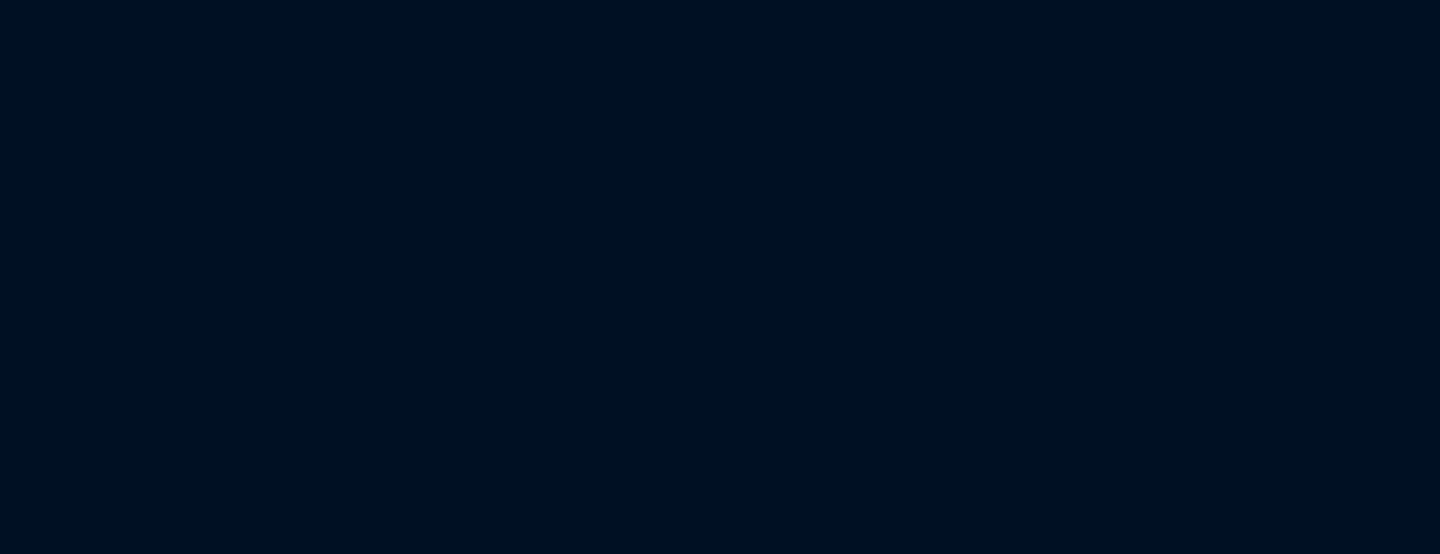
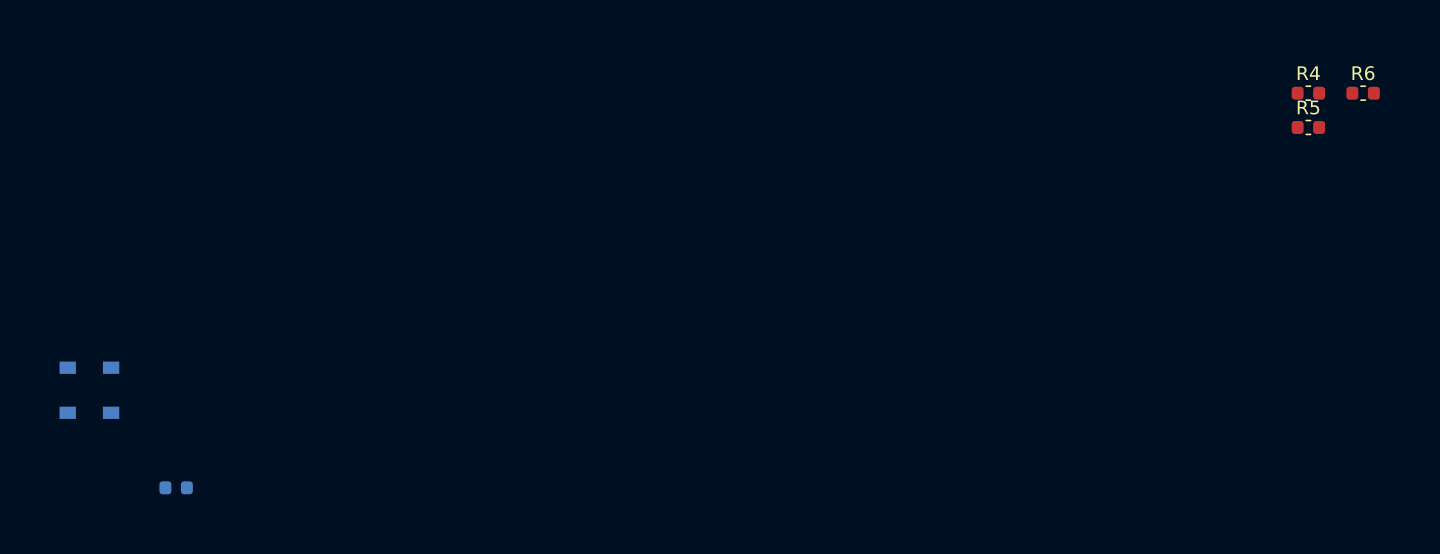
R4: none -> (1308, 93)
R6: none -> (1363, 93)
R5: none -> (1308, 127)
part: none -> (67, 390)
part: none -> (111, 390)
part: none -> (176, 487)

